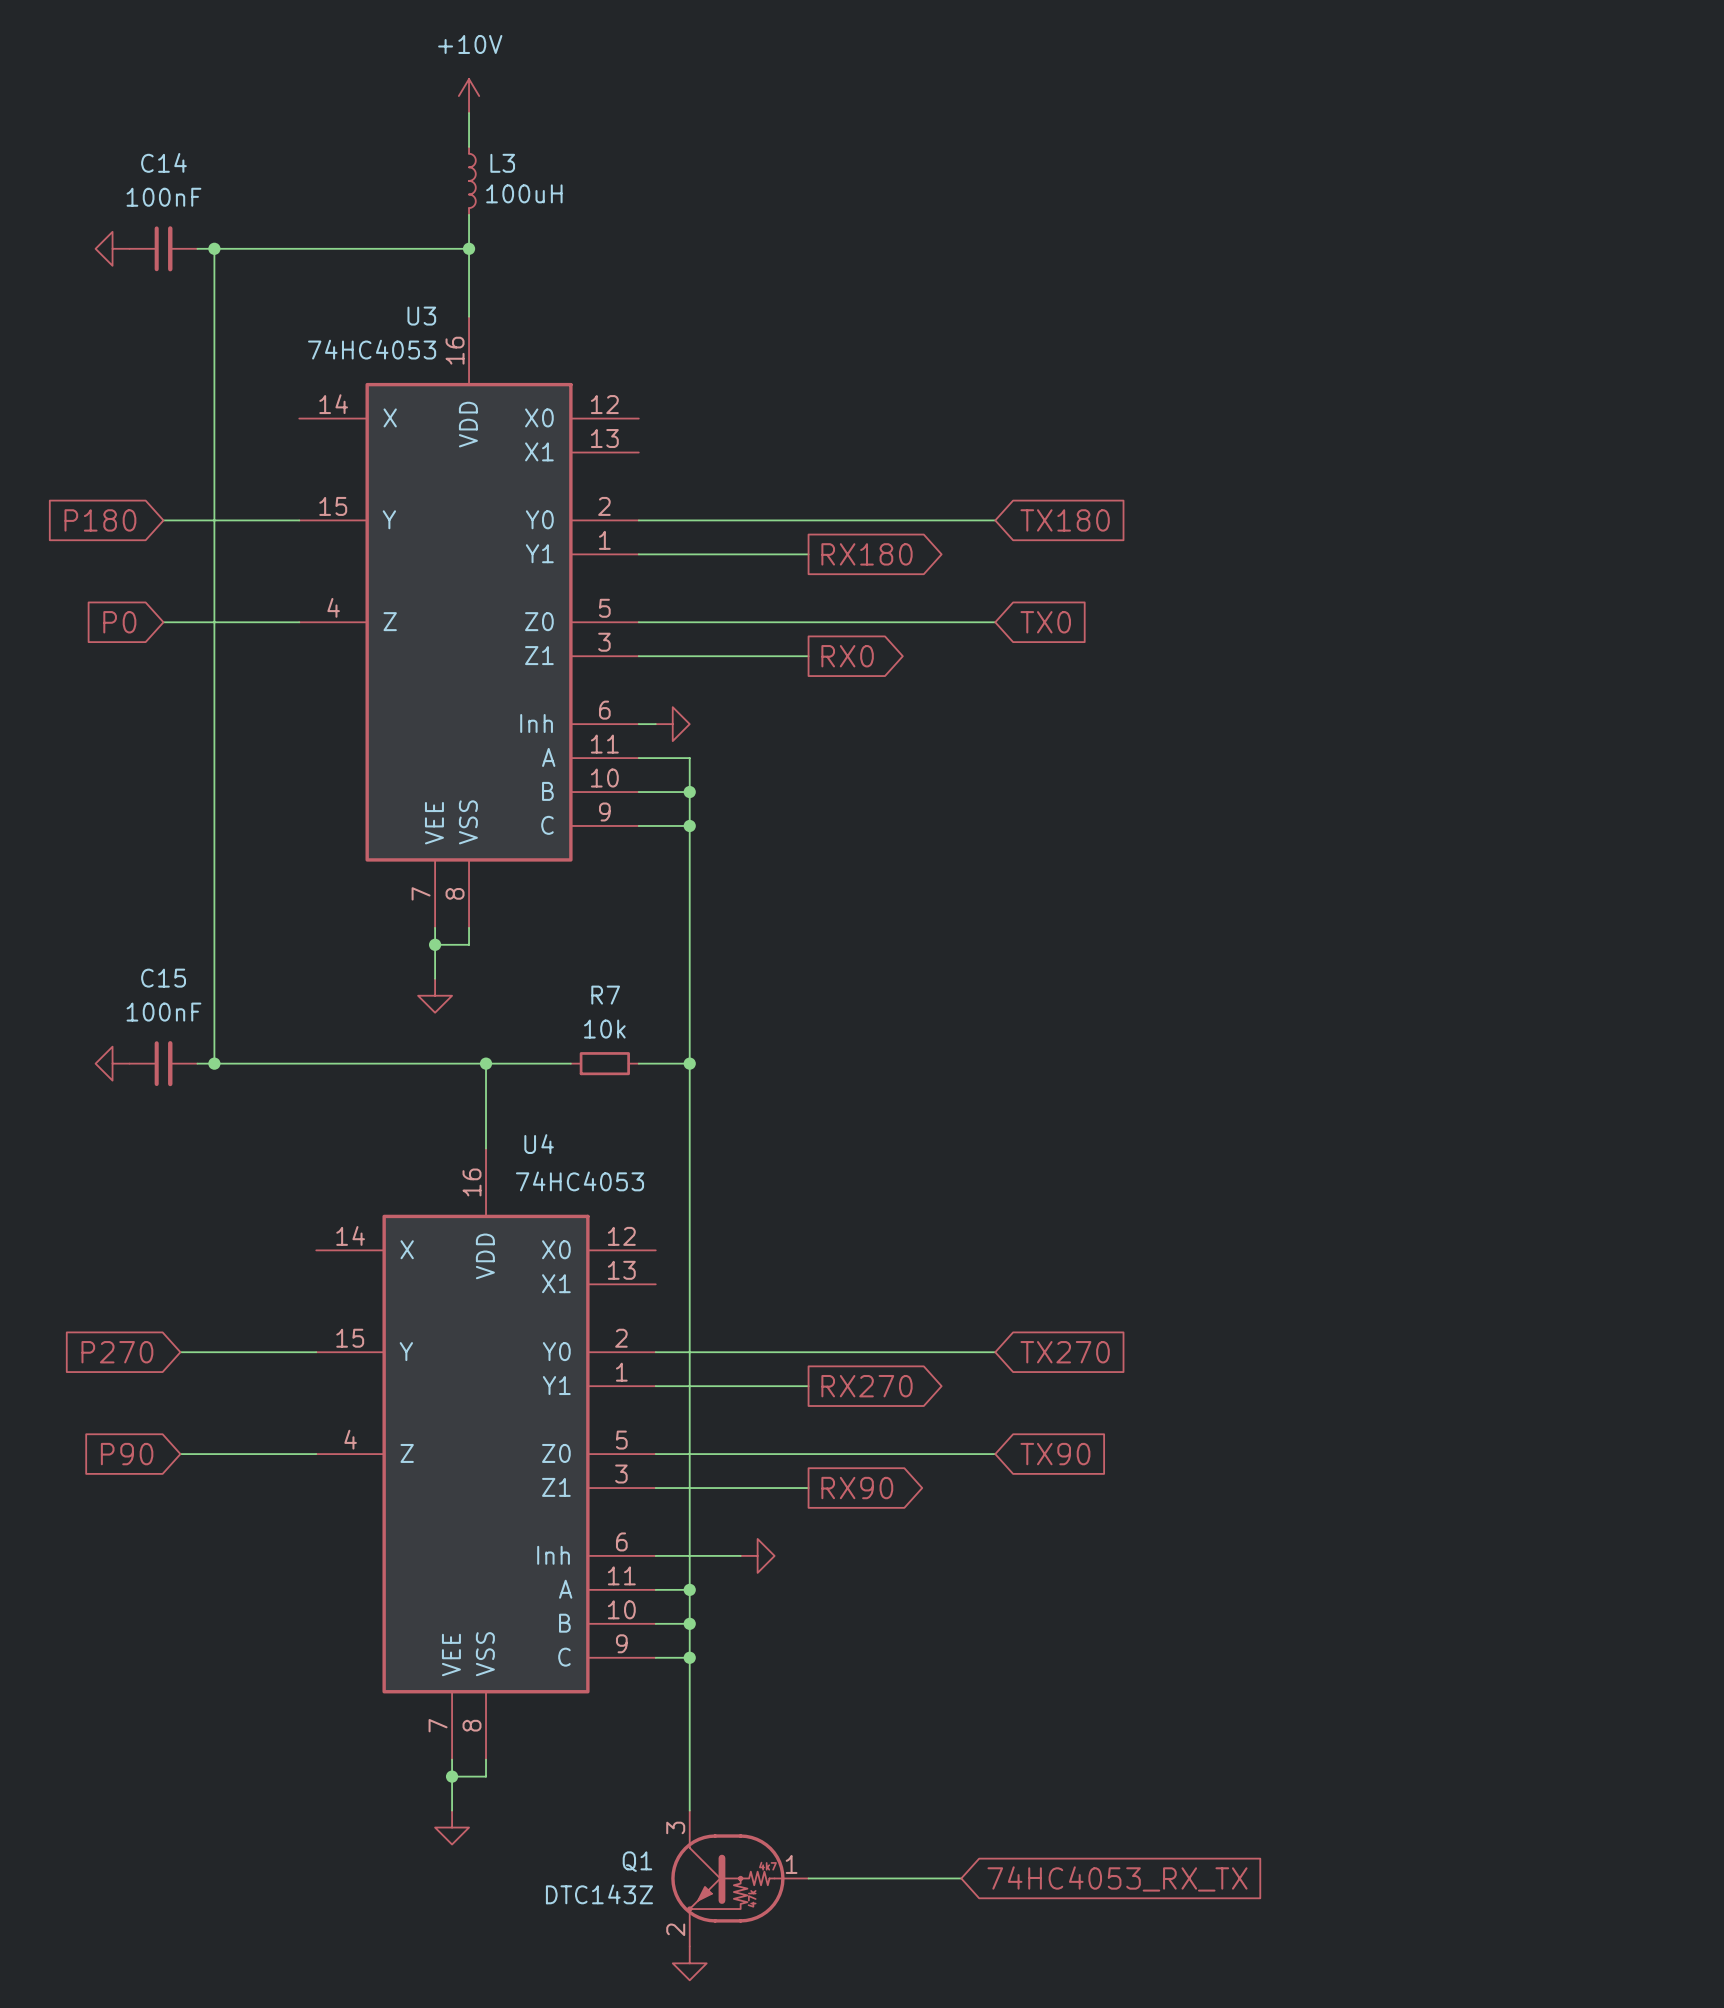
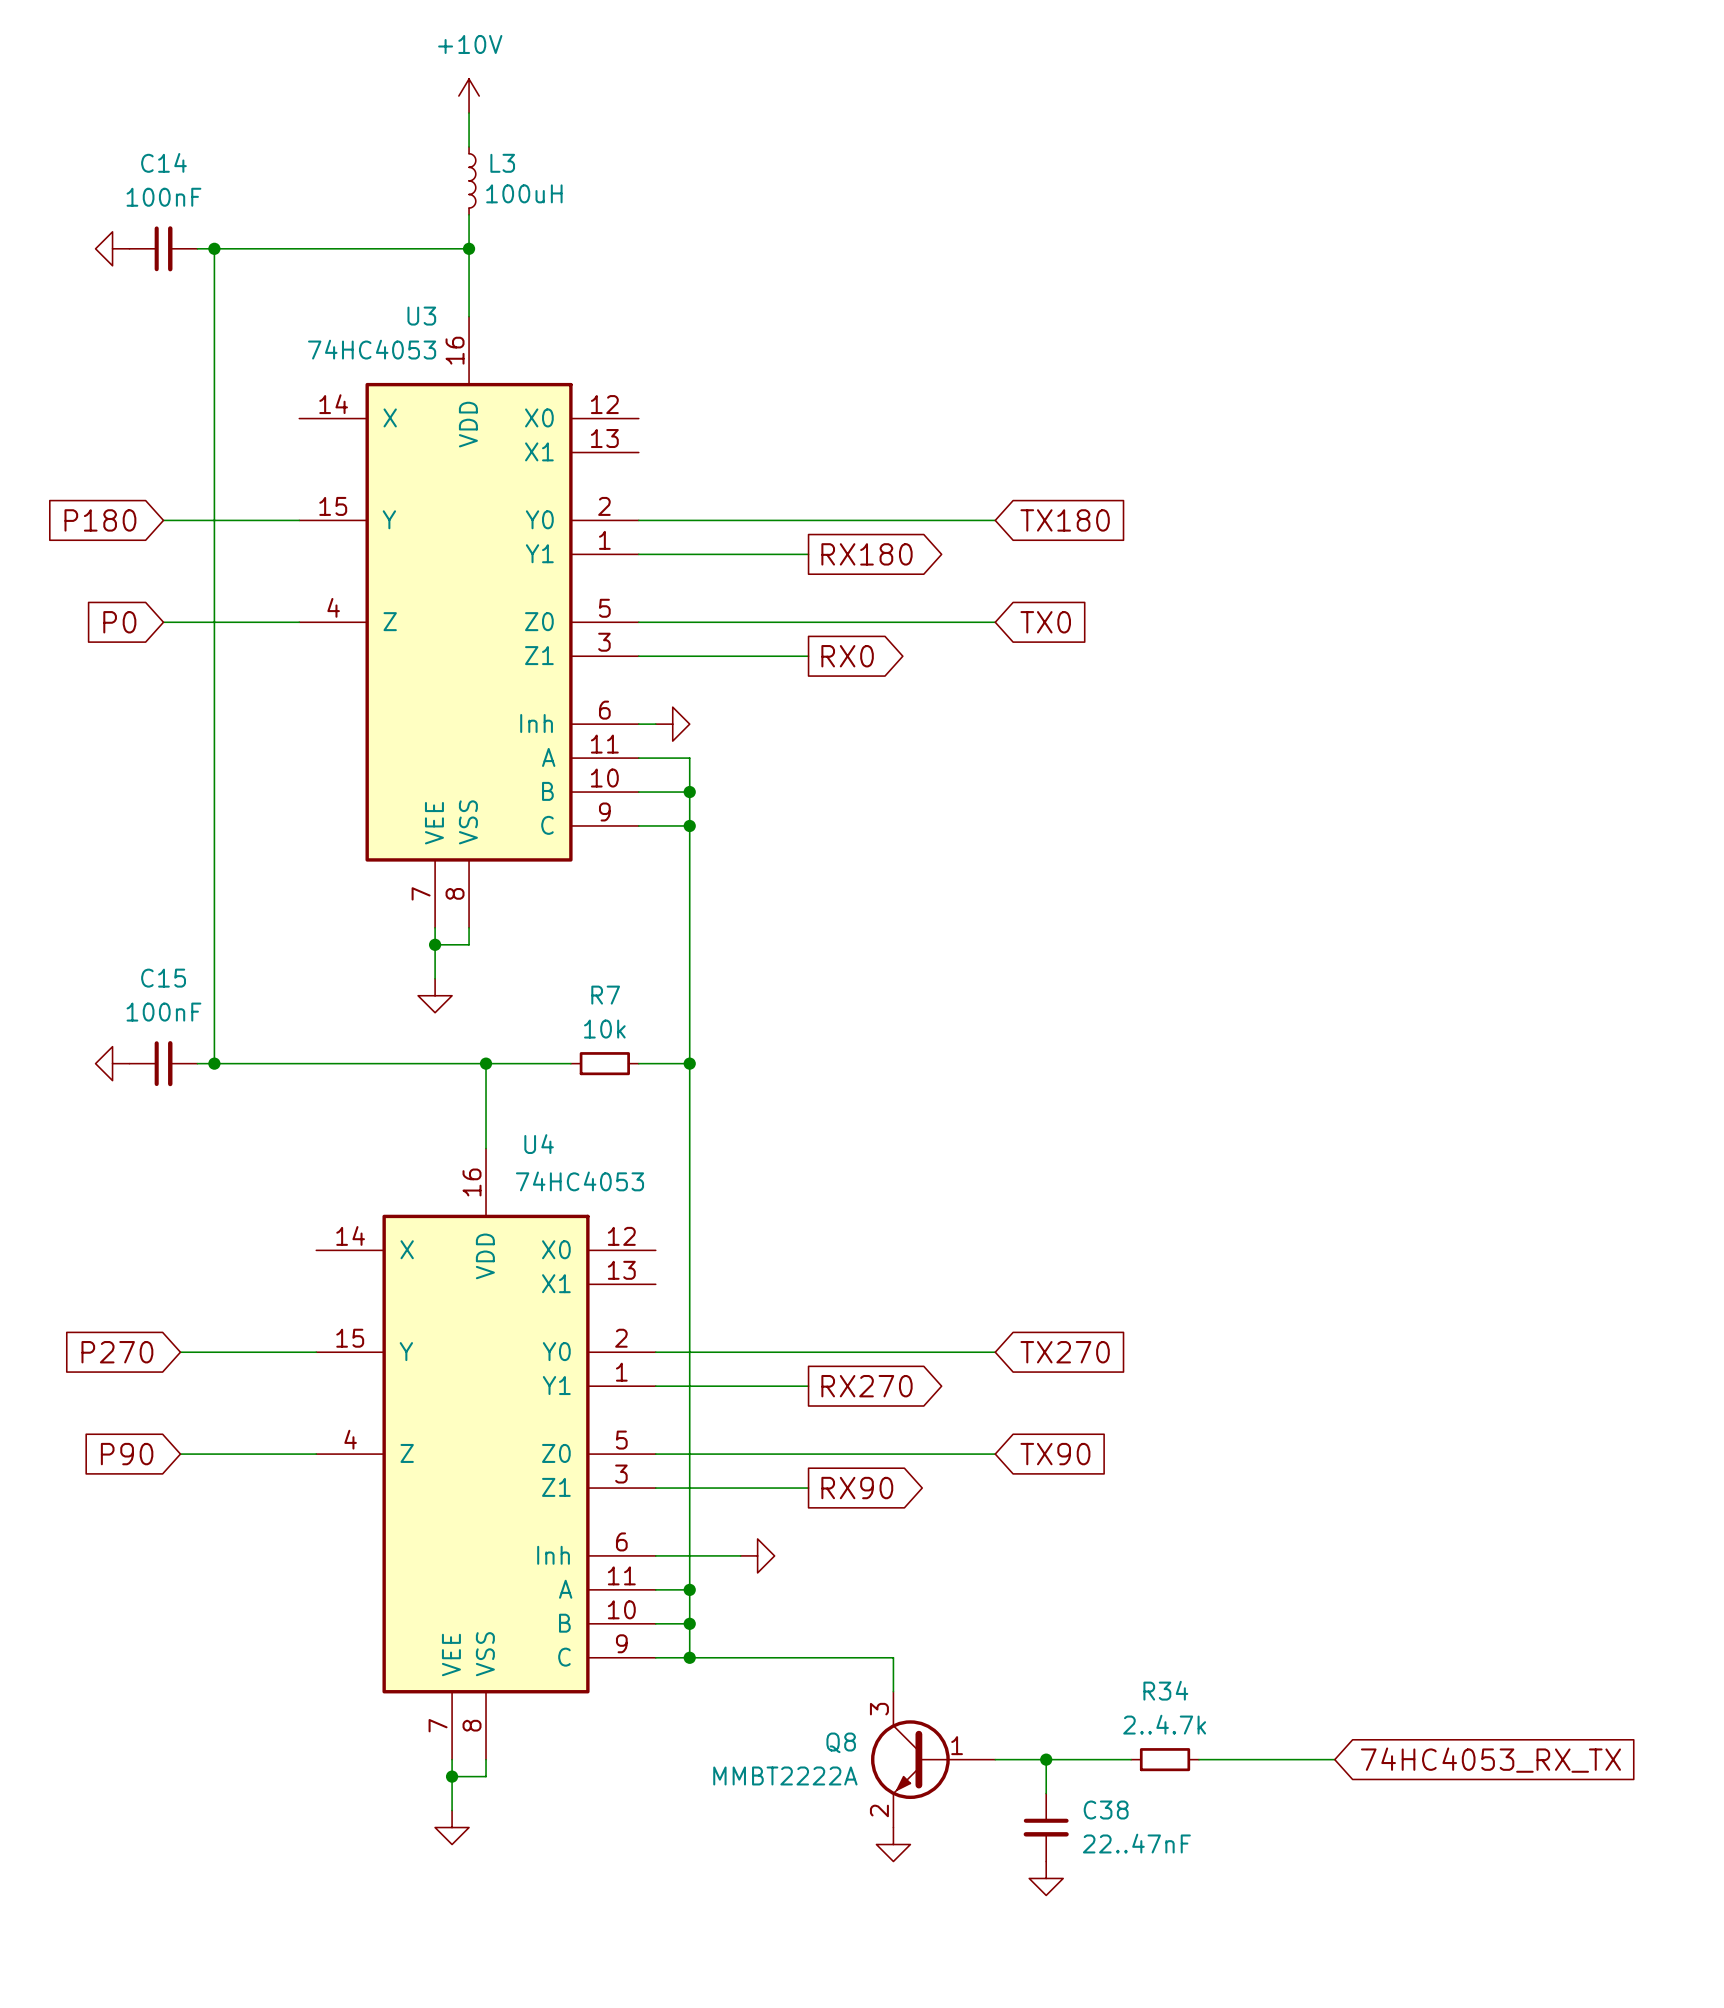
wire: (689, 1657) (689, 1810) -> (689, 1657) (893, 1657) (893, 1691)
Q8: none -> MMBT2222A (933, 1759)
wire: none -> (995, 1759) (1131, 1759)
wire: none -> (1046, 1759) (1046, 1793)
junction: none -> (1046, 1759)
R34: none -> 2..4.7k (1165, 1759)
wire: none -> (1198, 1759) (1334, 1759)
global label: none -> 74HC4053_RX_TX (1490, 1760)
C38: none -> 22..47nF (1046, 1827)
power symbol: none -> (893, 1844)
Q1: DTC143Z (739, 1878) -> none
wire: (808, 1878) (961, 1878) -> none
power symbol: none -> (1046, 1878)
global label: 74HC4053_RX_TX (1117, 1878) -> none
power symbol: (689, 1963) -> none

